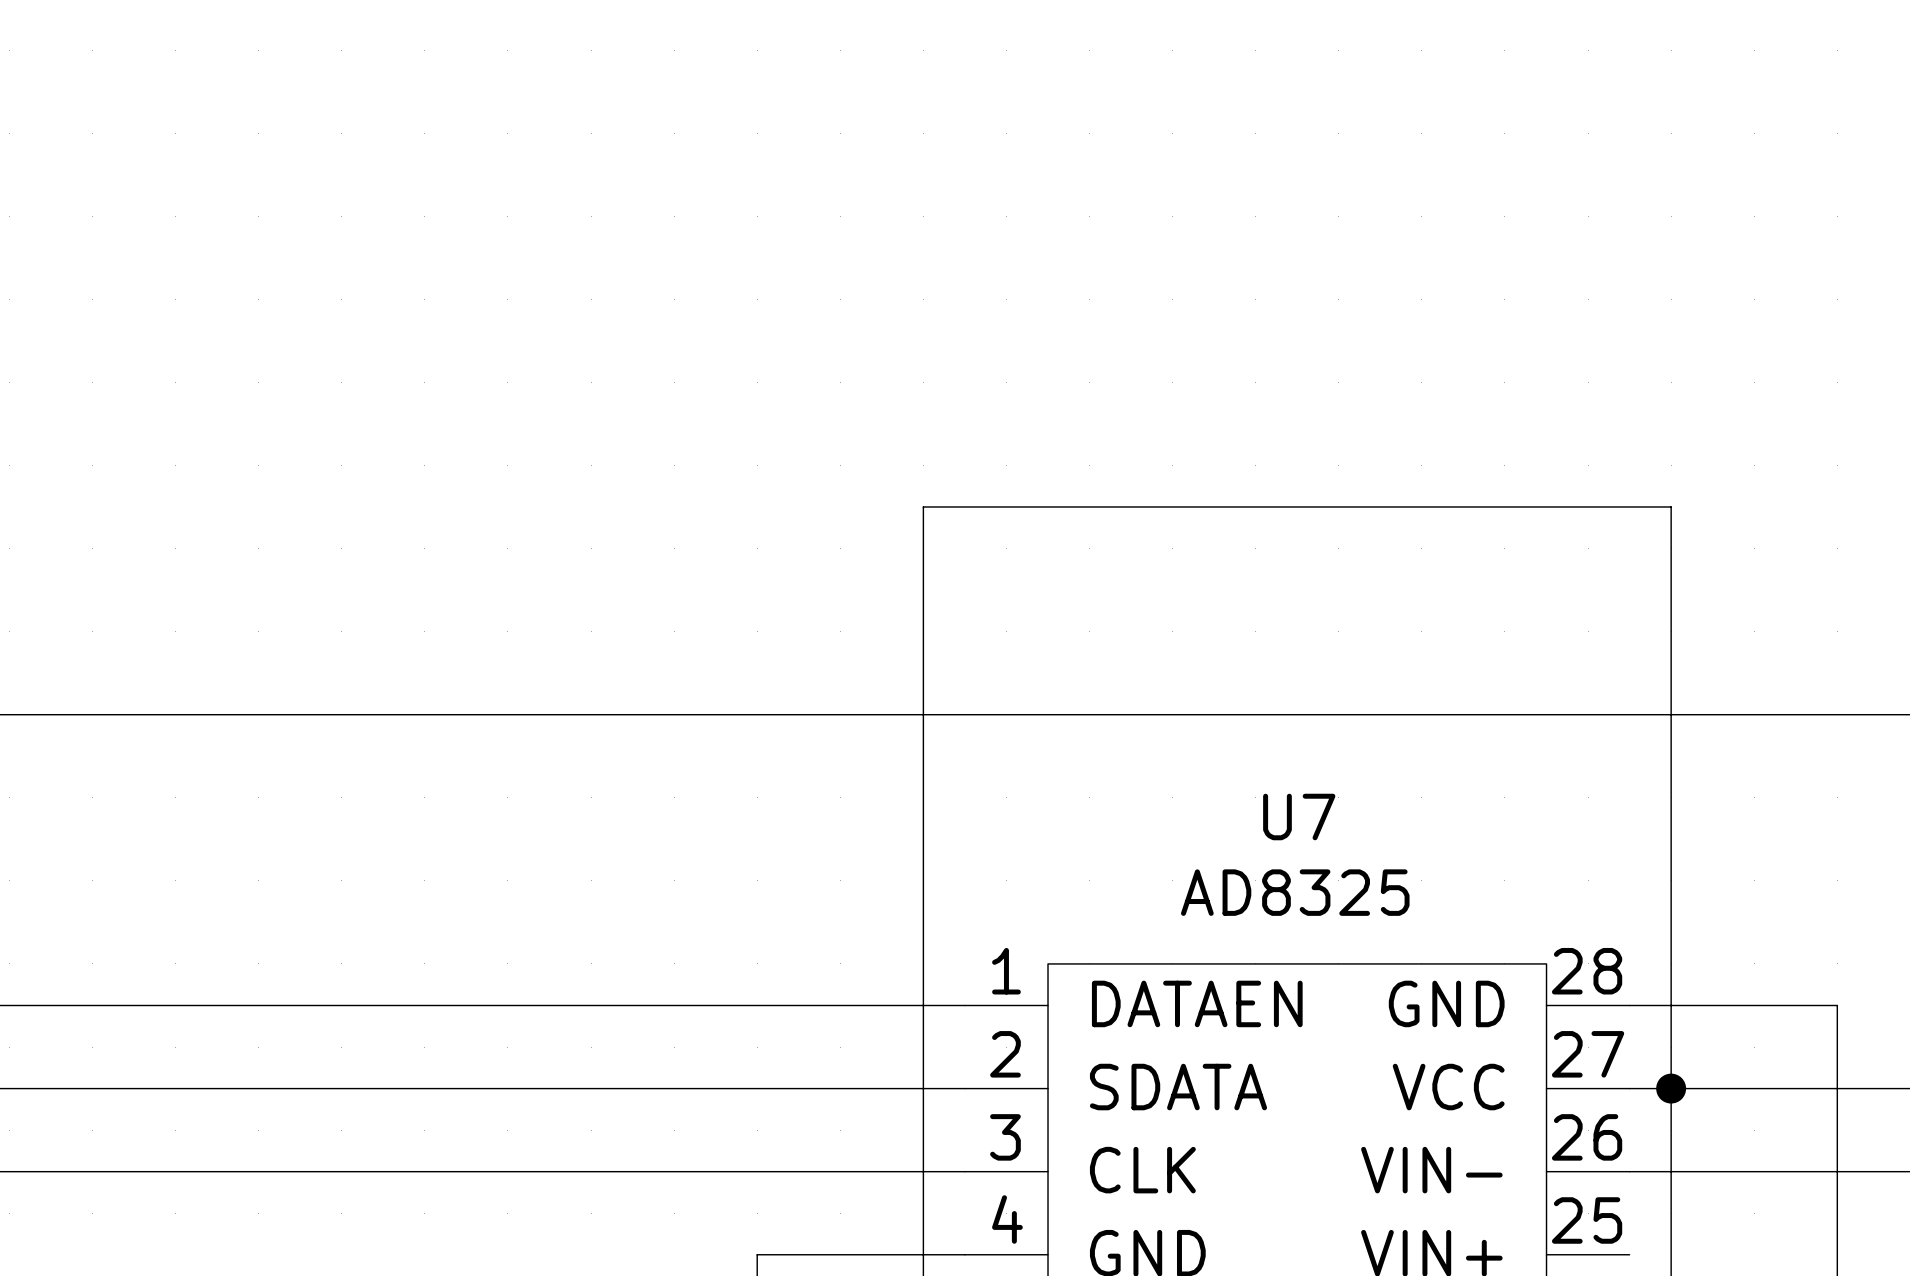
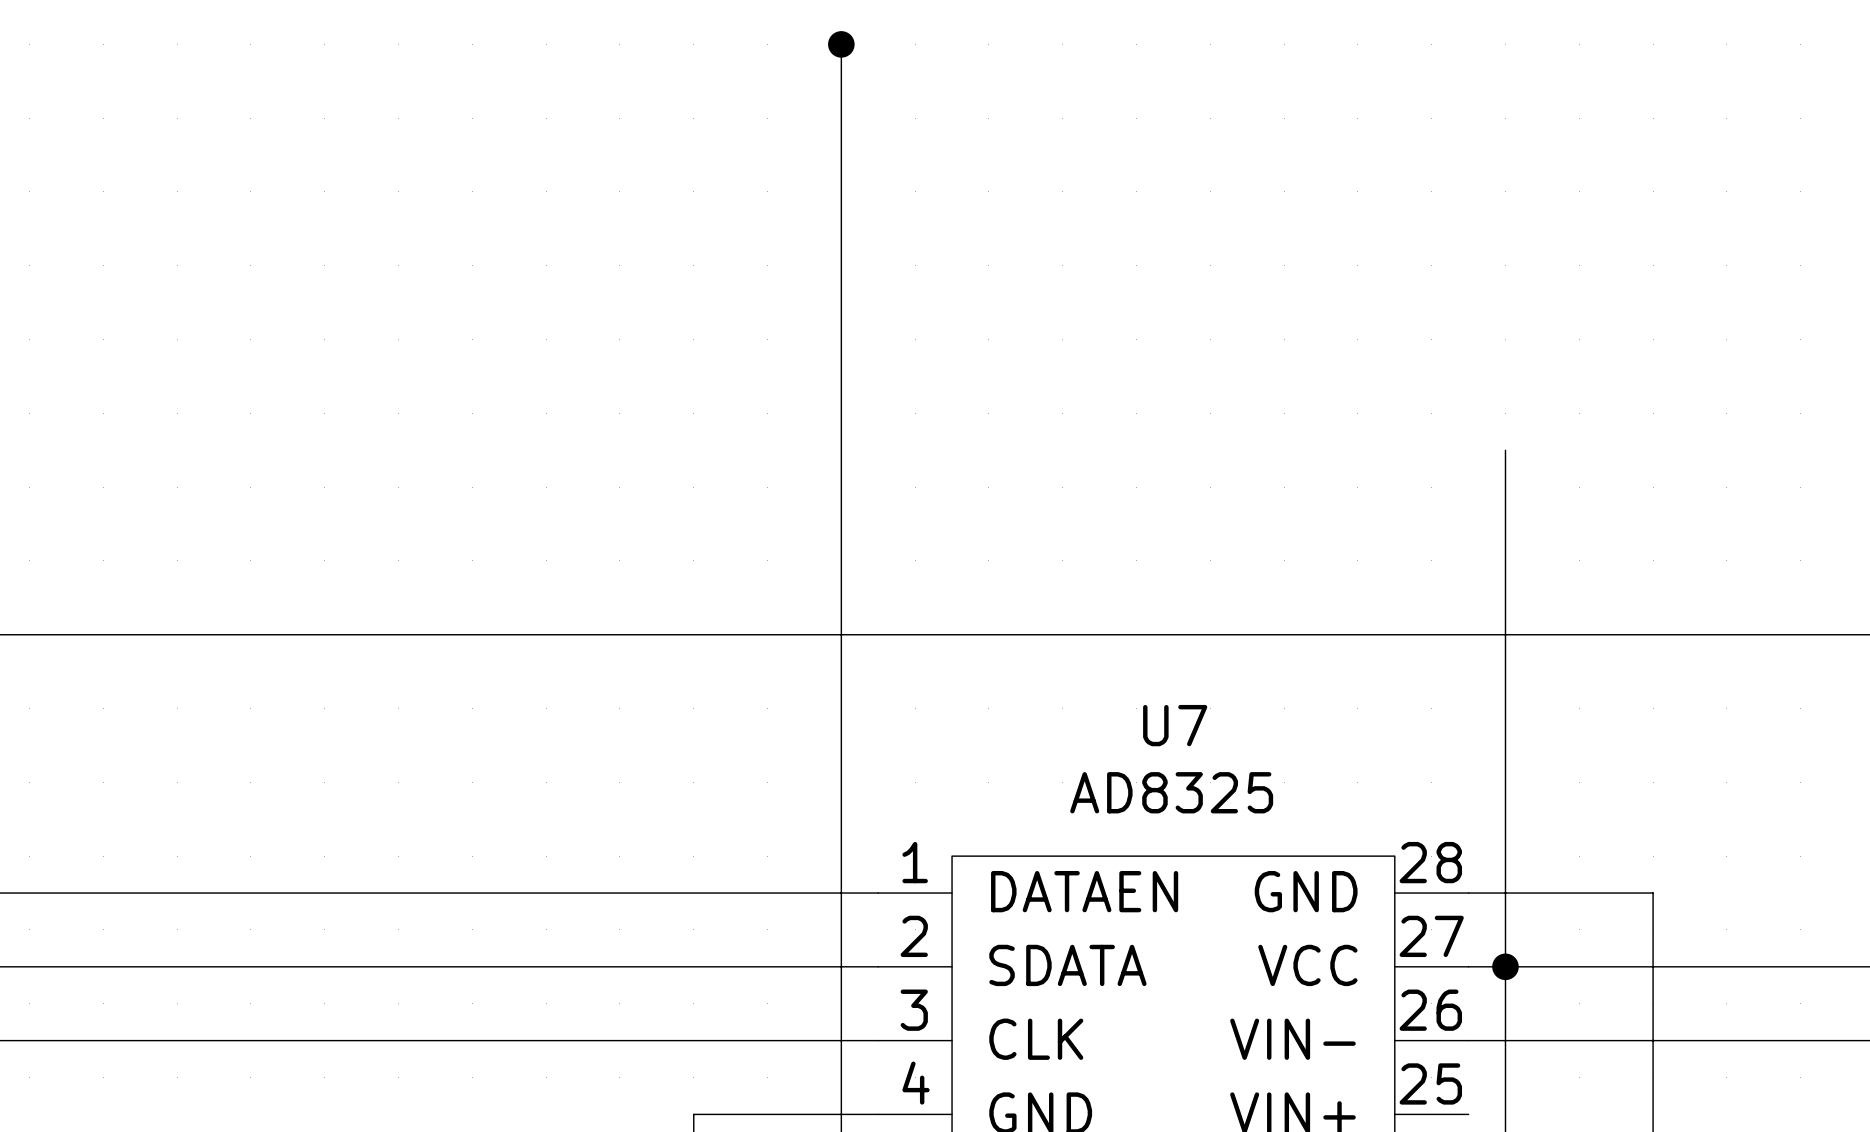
junction: none -> (841, 44)
wire: (923, 506) (1671, 506) -> (841, 450) (841, 44)

